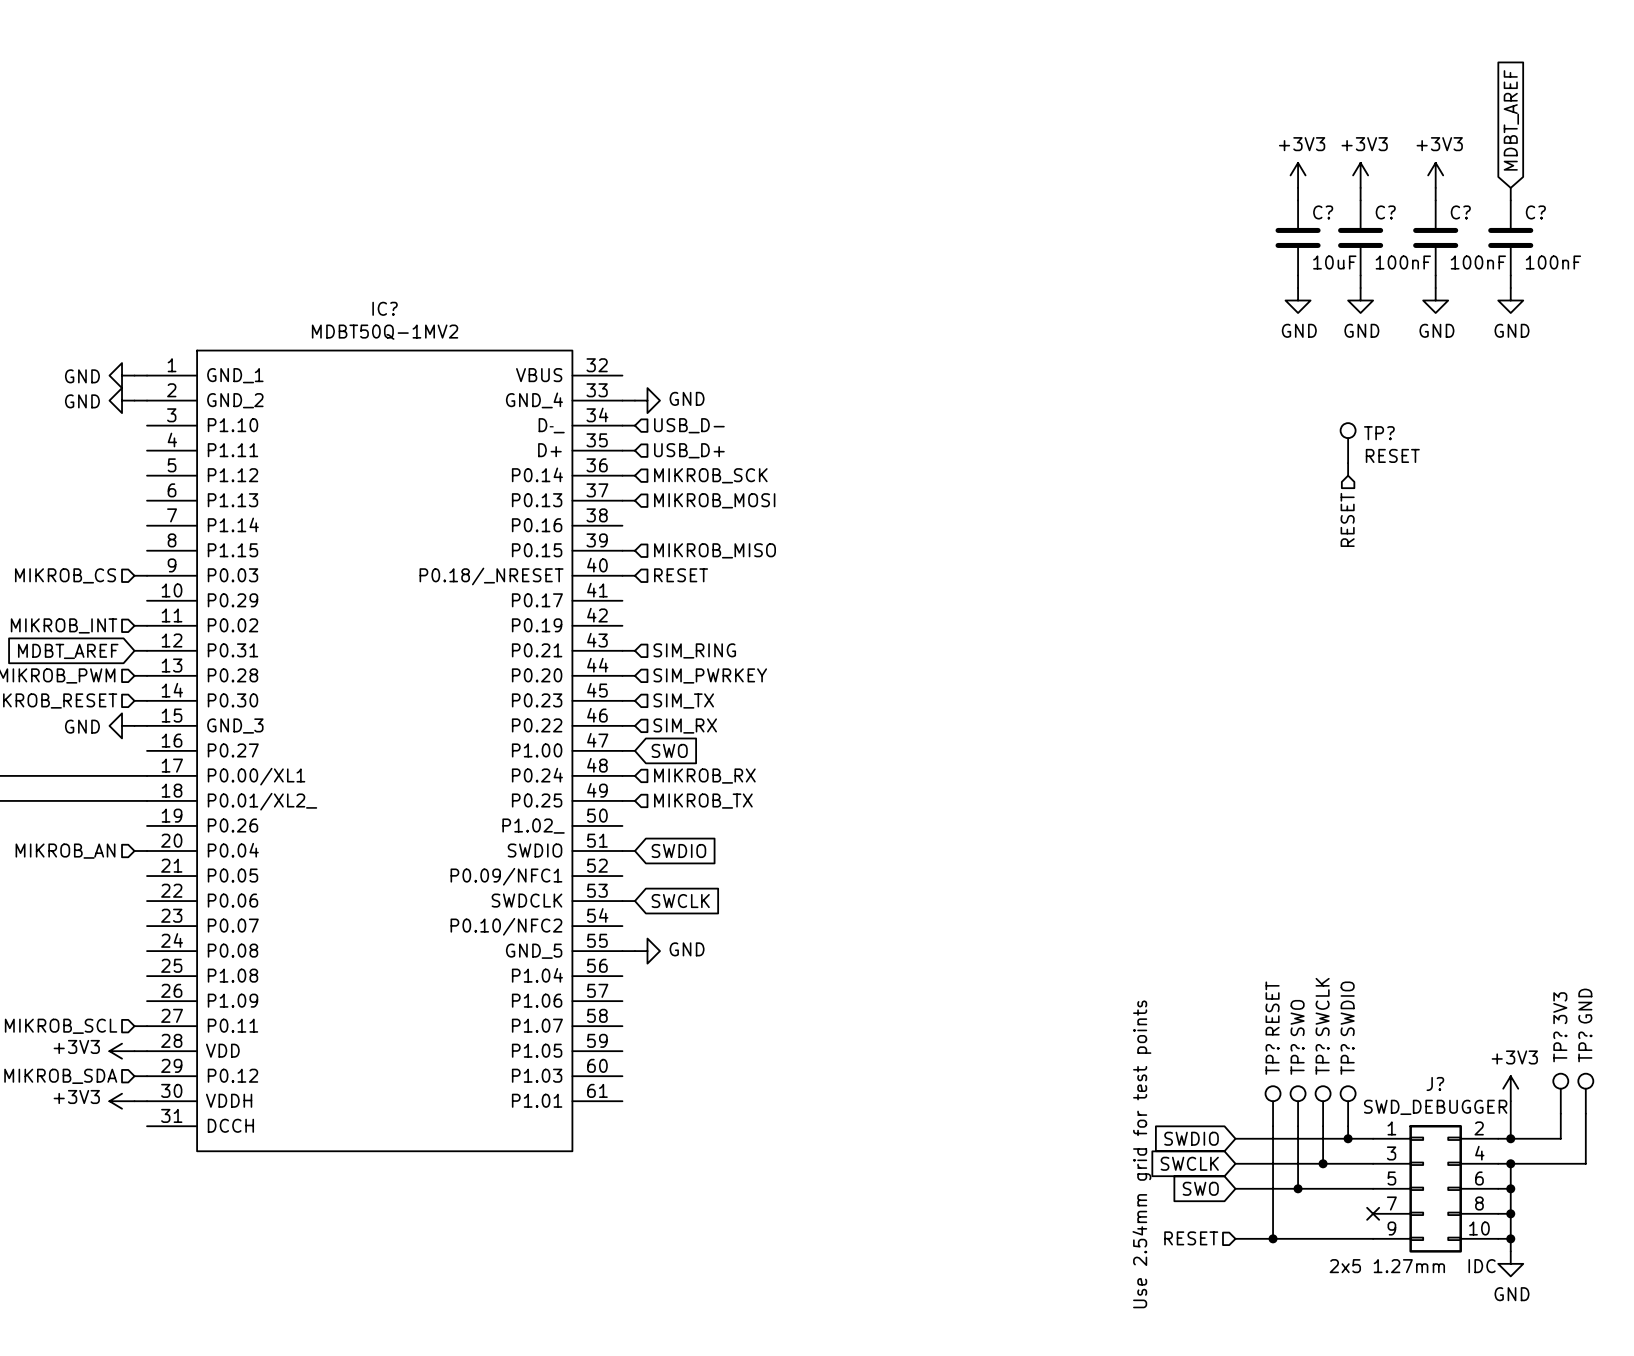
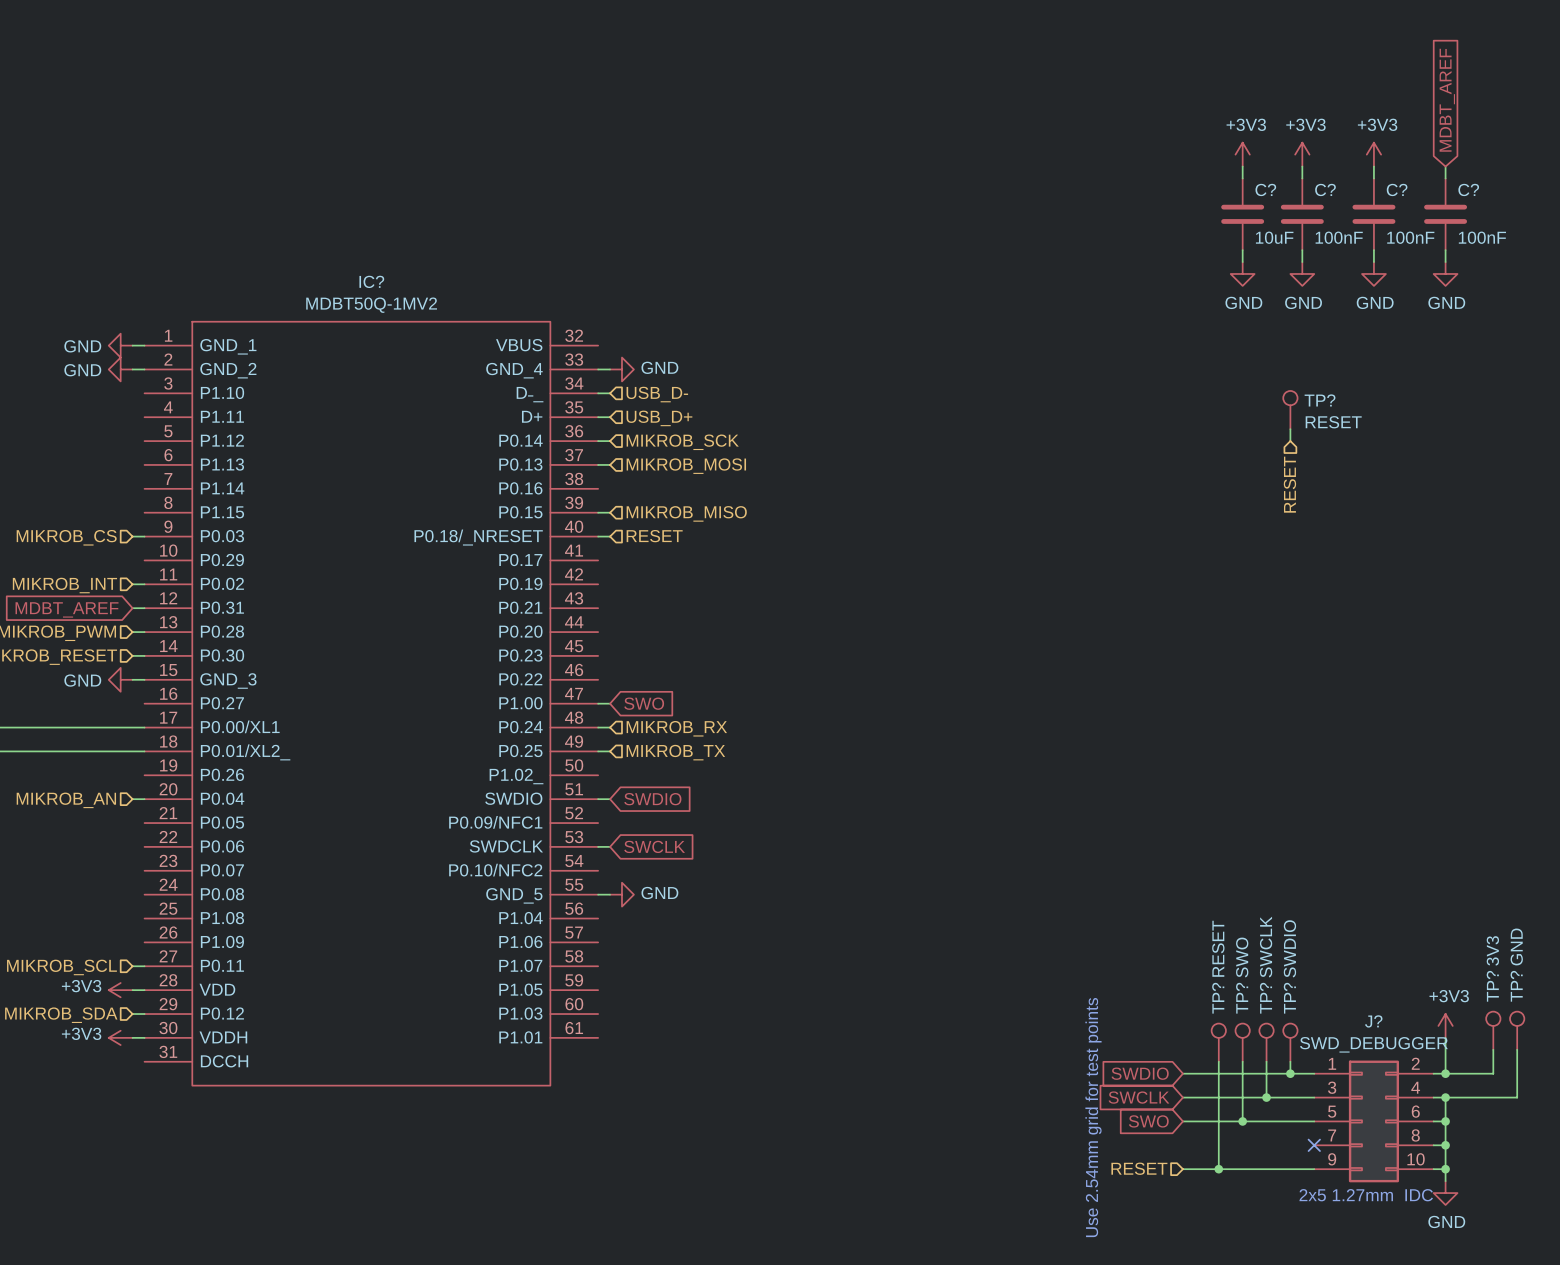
wire: (622, 650) (634, 650) -> none
hierarchical label: SIM_RING (694, 650) -> none
wire: (622, 675) (634, 675) -> none
hierarchical label: SIM_PWRKEY (710, 675) -> none
wire: (622, 700) (634, 700) -> none
hierarchical label: SIM_TX (683, 700) -> none
wire: (622, 725) (634, 725) -> none
hierarchical label: SIM_RX (685, 726) -> none

